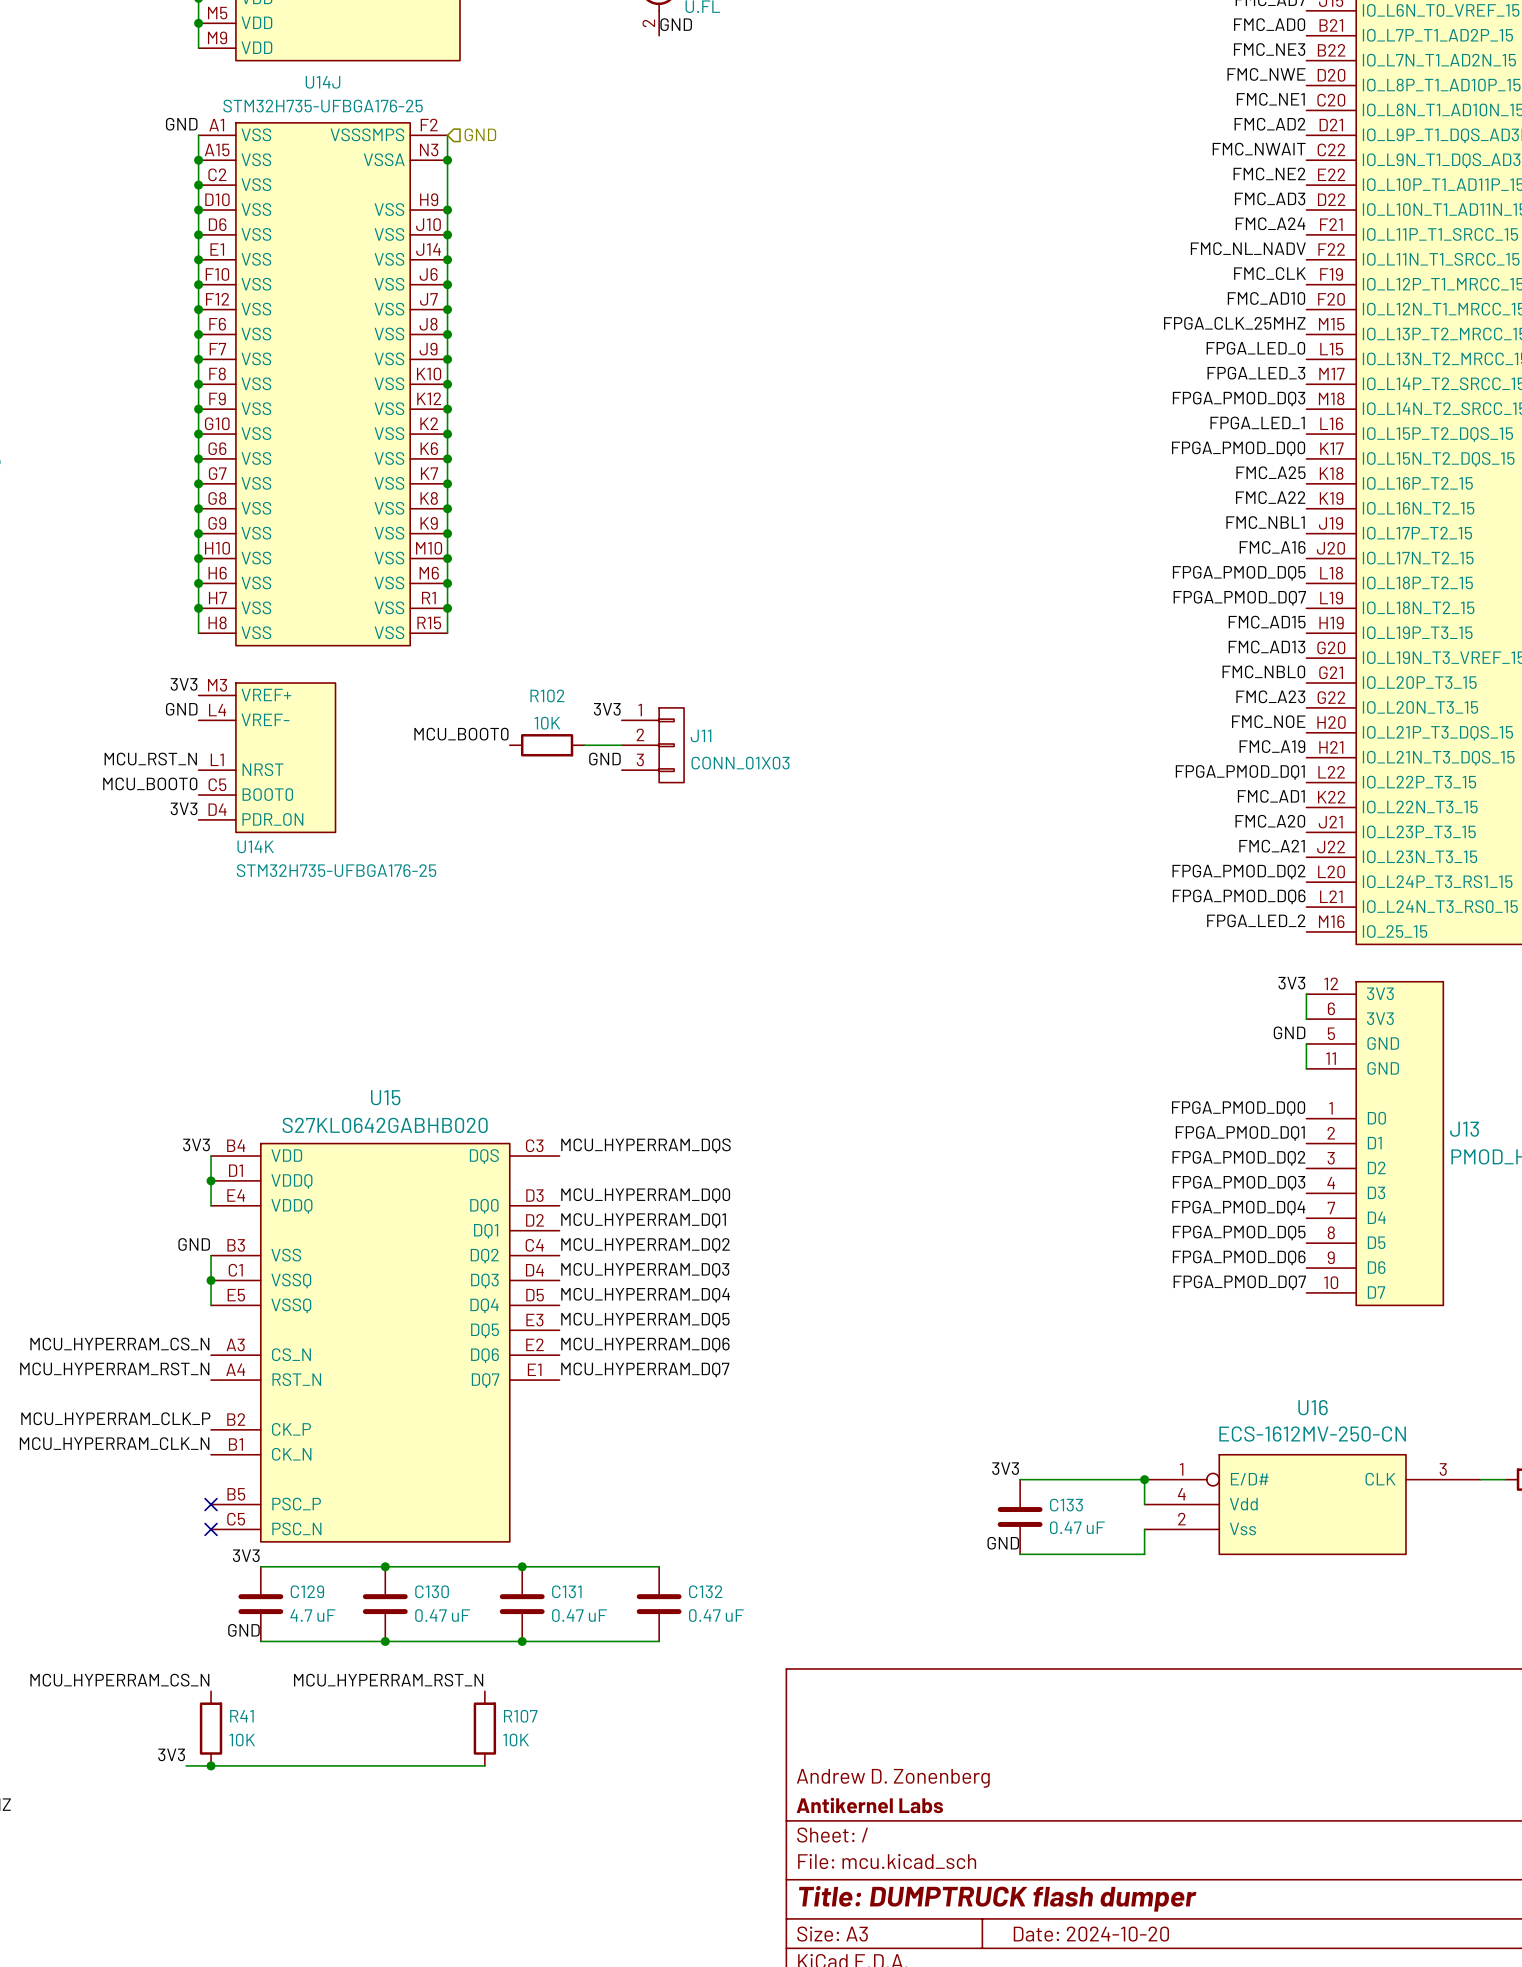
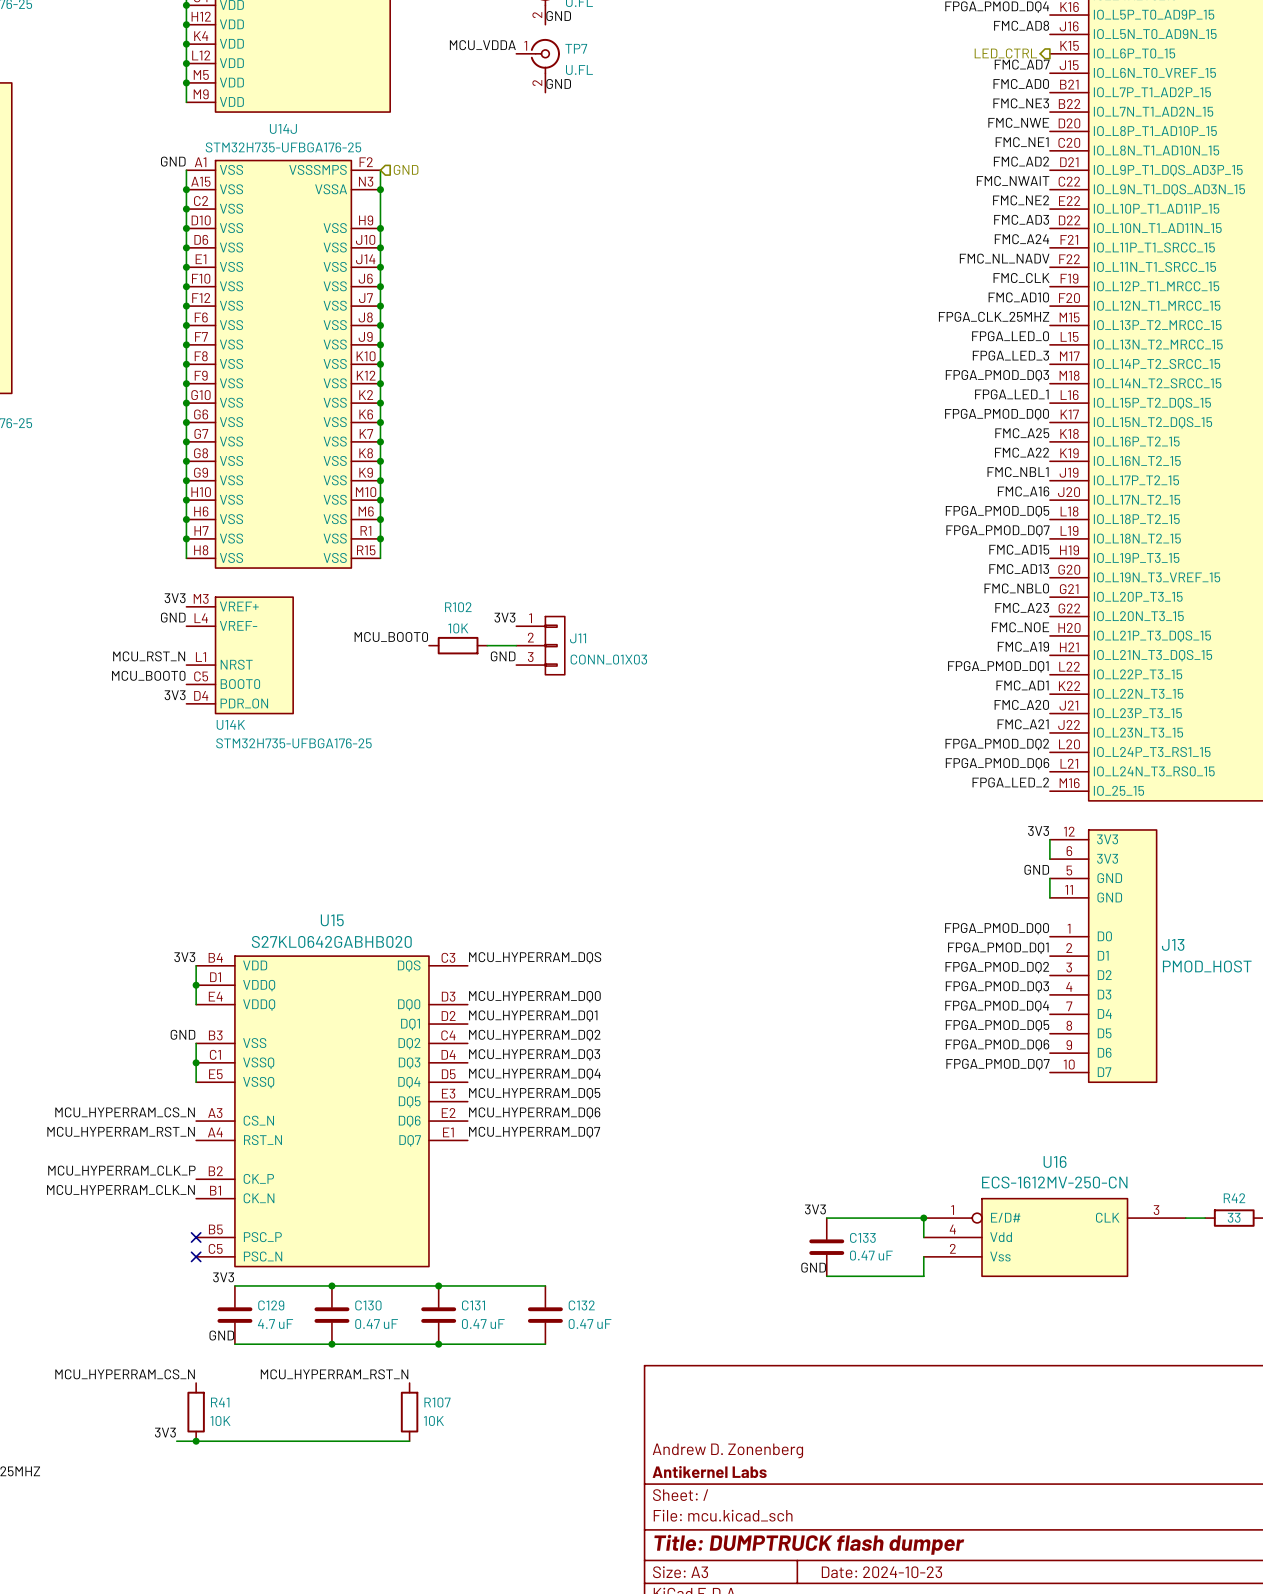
title block: Date: 2024-10-20 (1091, 1934) -> Date: 2024-10-23 (881, 1572)

